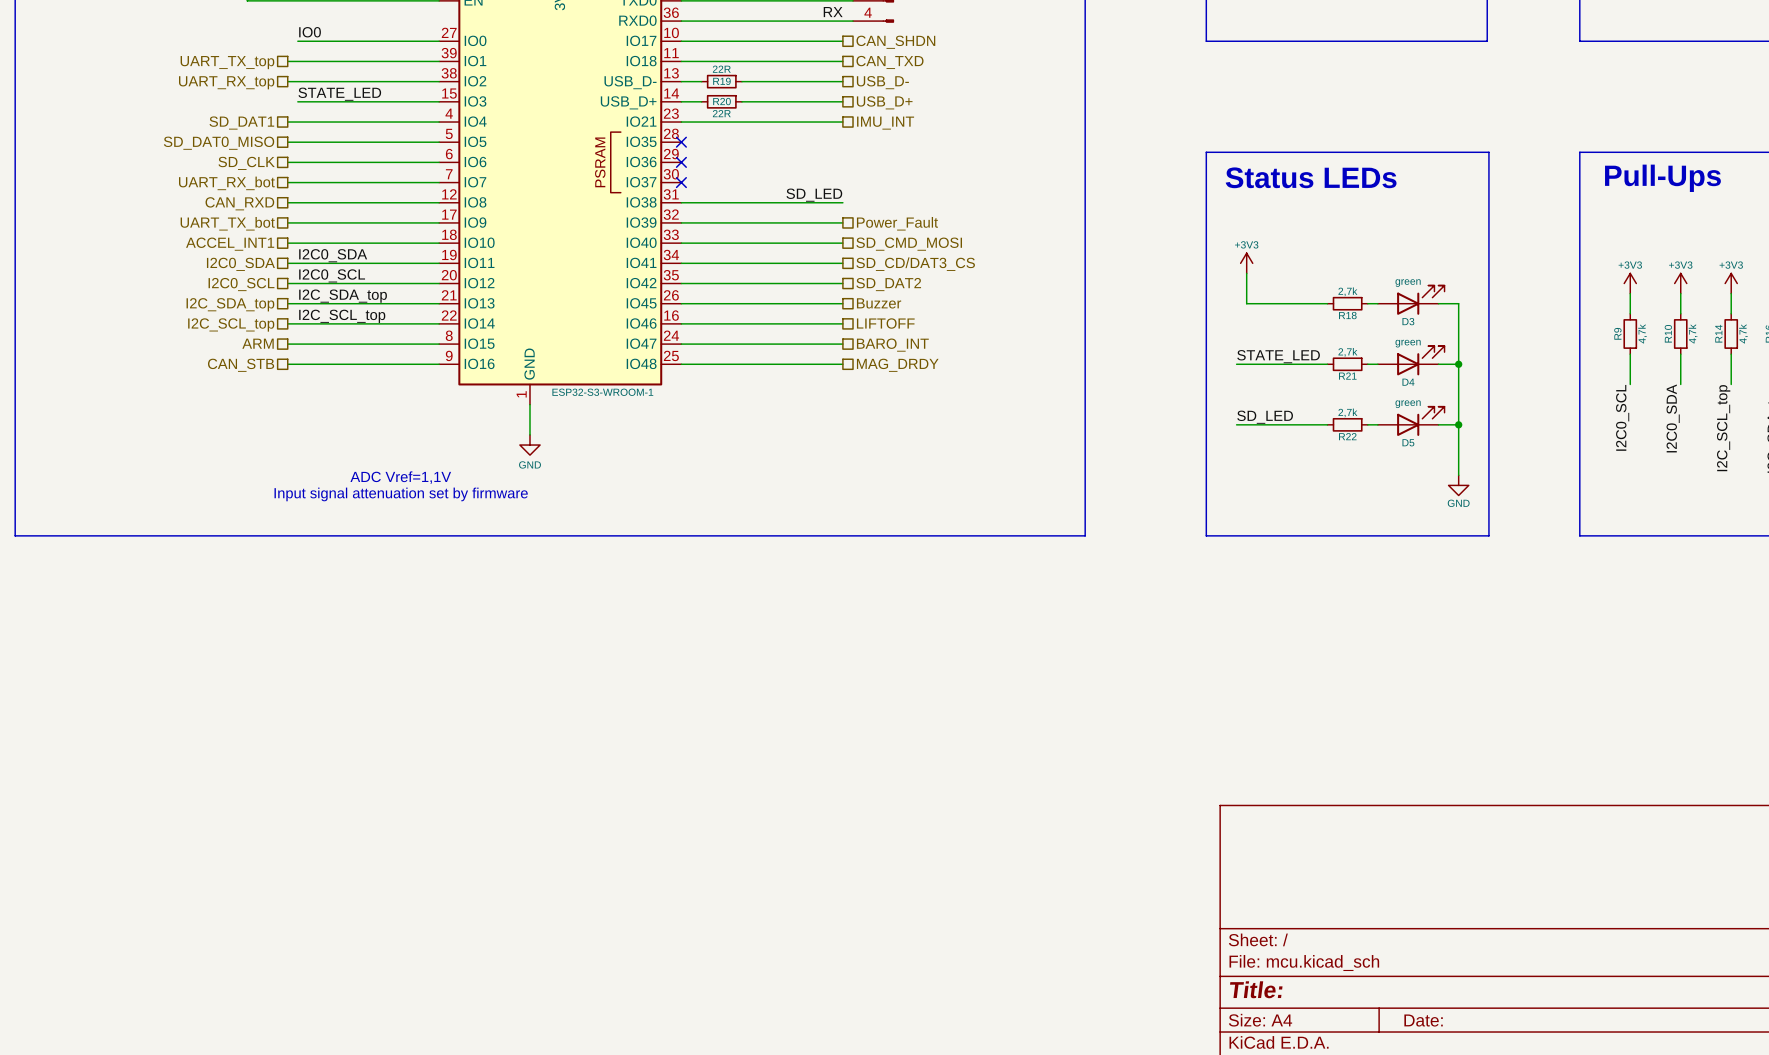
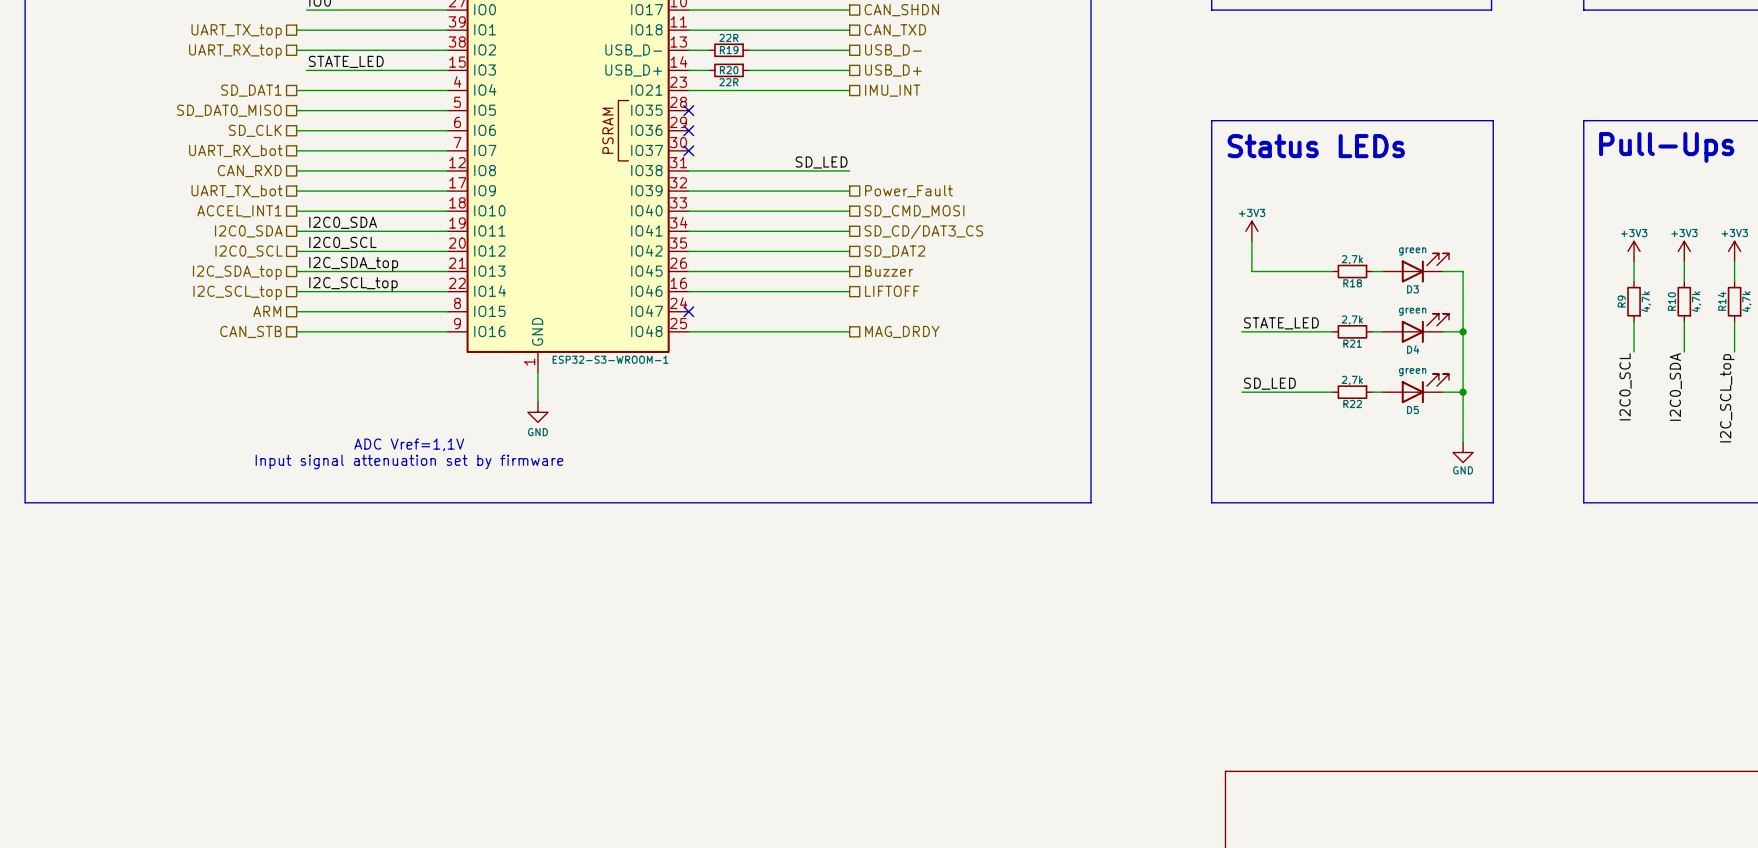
wire: (681, 344) (842, 344) -> none
no-connect mark: none -> (688, 311)
hierarchical label: BARO_INT (892, 345) -> none

